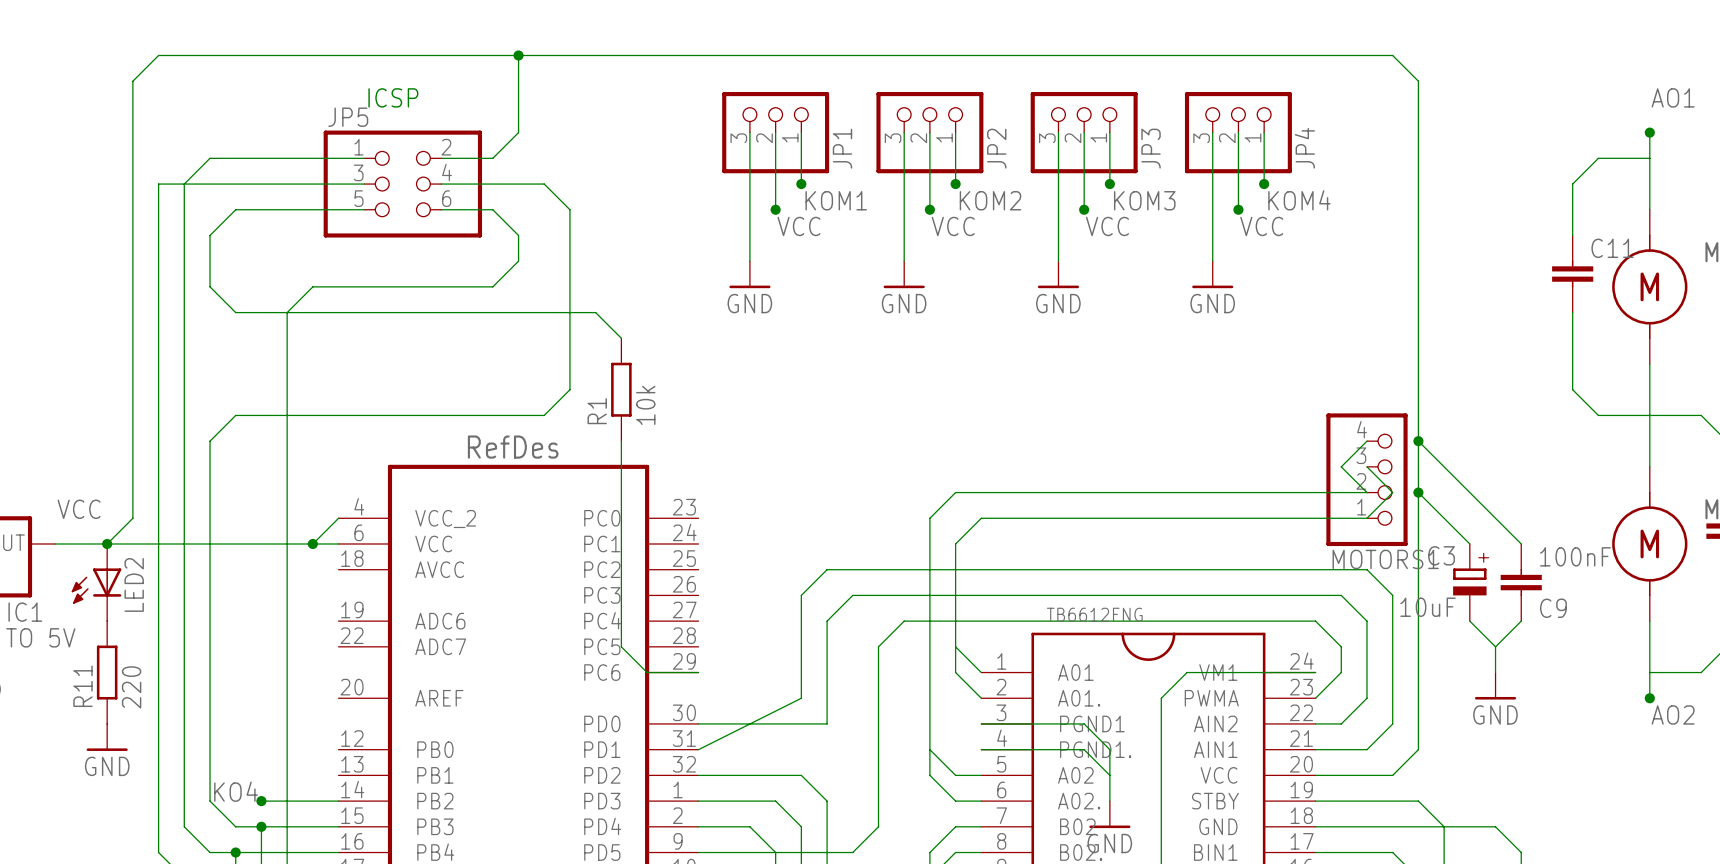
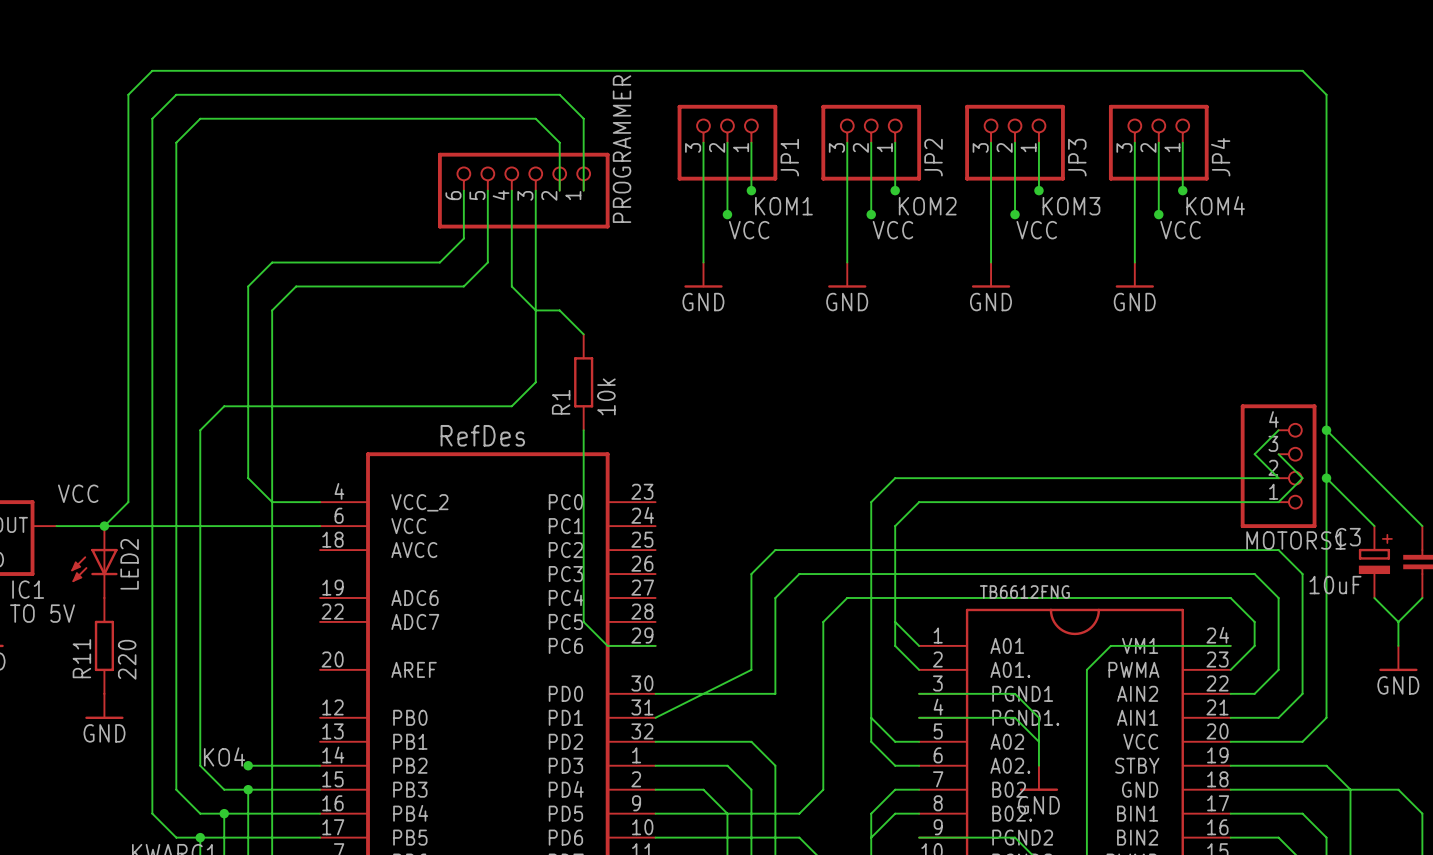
wire: (518, 55) (518, 132) (492, 158) (441, 158) -> none
junction: (518, 55) -> none
text: ICSP (393, 97) -> none
wire: (364, 158) (210, 158) (184, 184) -> (559, 190) (559, 142) (535, 118) (200, 118) (176, 142) (176, 190)
wire: (158, 184) (364, 184) -> (152, 190) (152, 118) (176, 94) (559, 94) (583, 118) (583, 190)
JP5: (402, 184) -> none
wire: (441, 184) (544, 184) (569, 209) -> (535, 190) (535, 214)
PROGRAMMER: none -> (523, 190)
wire: (364, 209) (235, 209) (210, 235) (210, 286) (235, 312) (569, 312) -> (511, 190) (511, 286) (535, 310)
wire: (441, 209) (492, 209) (518, 235) -> (487, 190) (487, 238)
wire: (338, 518) (312, 543) -> (320, 502) (272, 502) (248, 478) (248, 286) (272, 262) (439, 262) (463, 238) (463, 190)
junction: (312, 543) -> none

